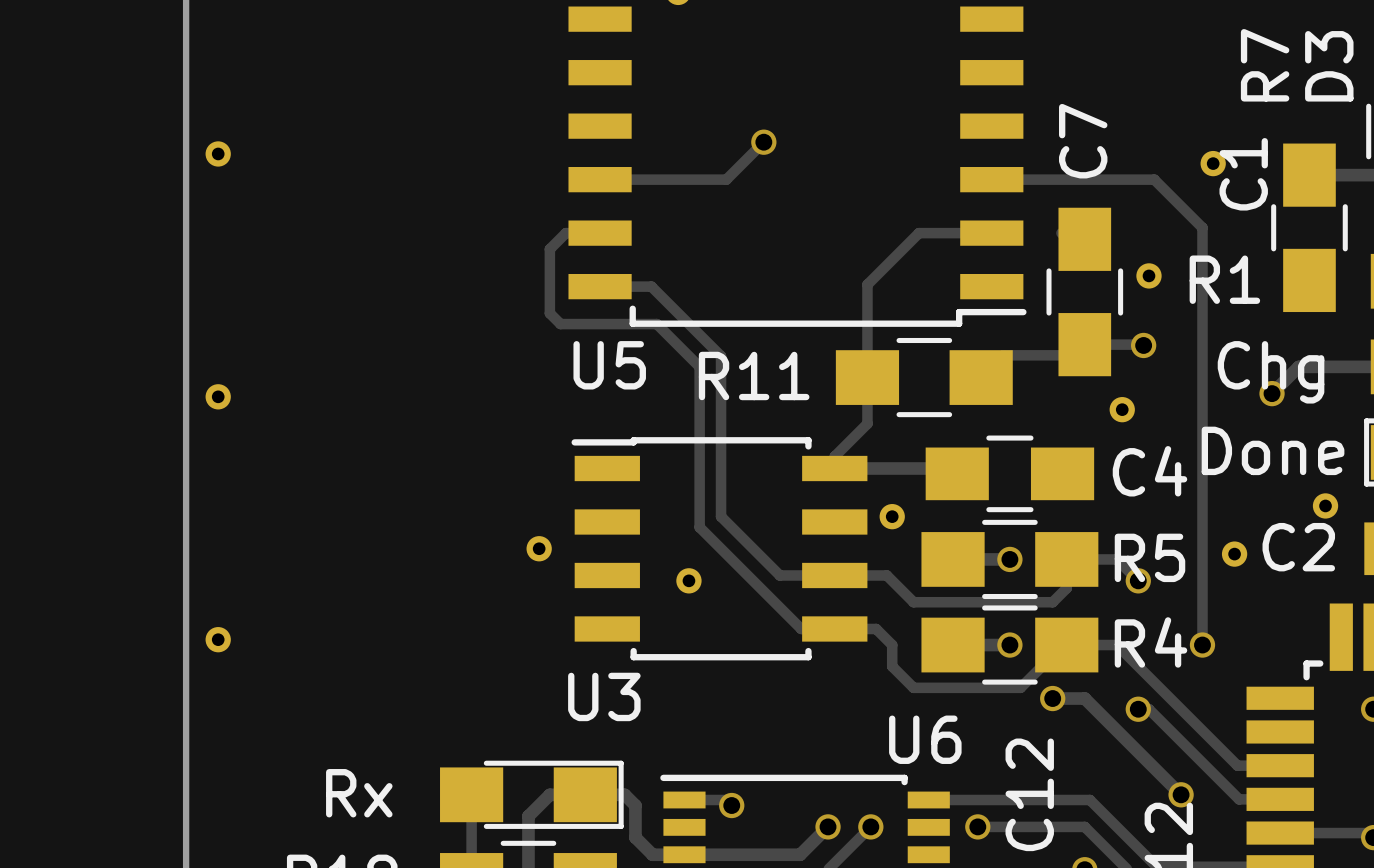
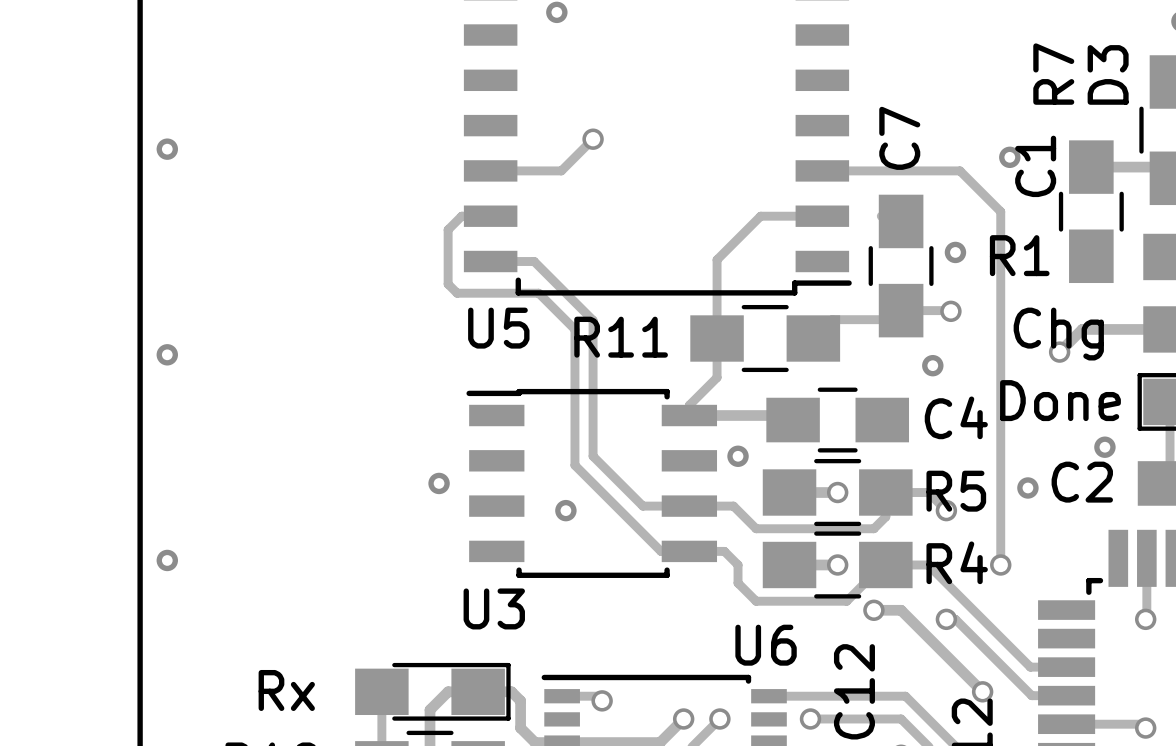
track: (763, 142) (726, 179) (683, 179) -> (593, 139) (561, 170)
via position: (763, 142) -> (593, 139)

